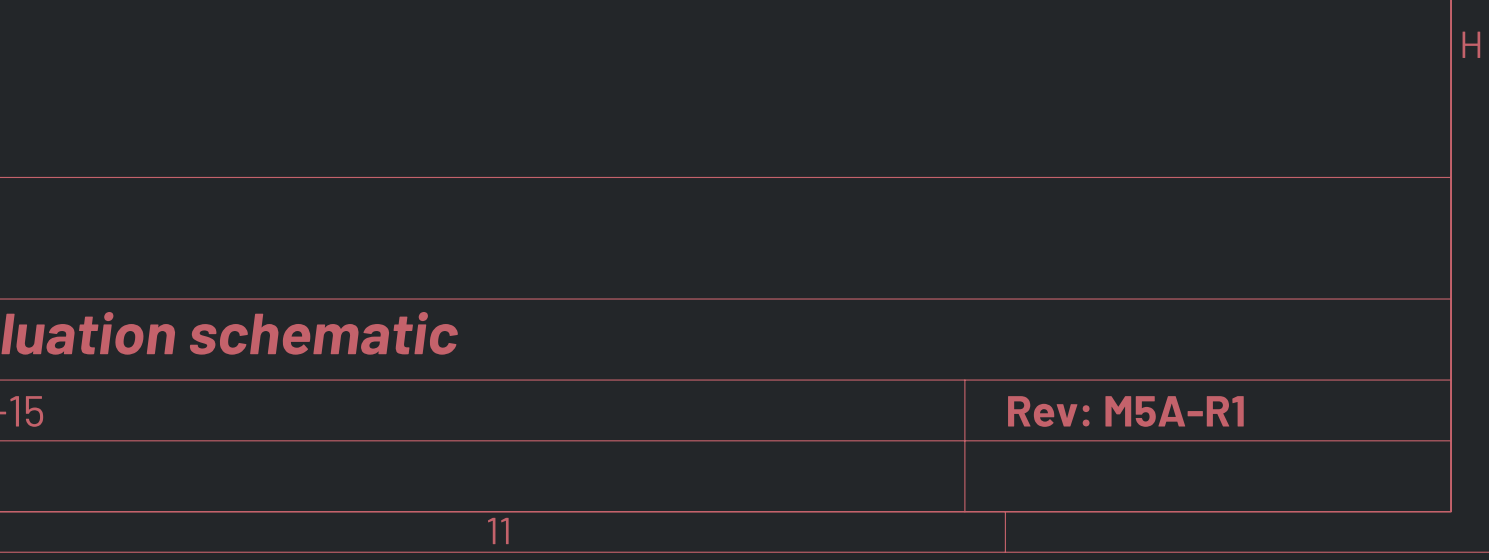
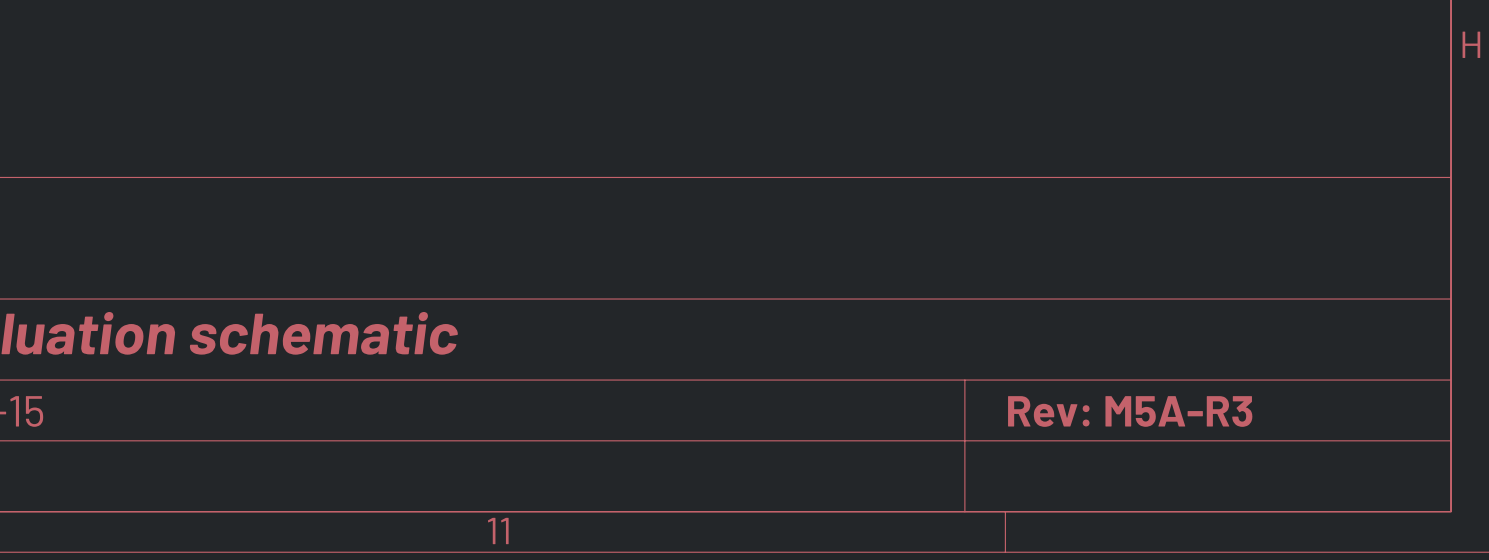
title block: Rev: M5A-R1 (1125, 411) -> Rev: M5A-R3 (1130, 411)

